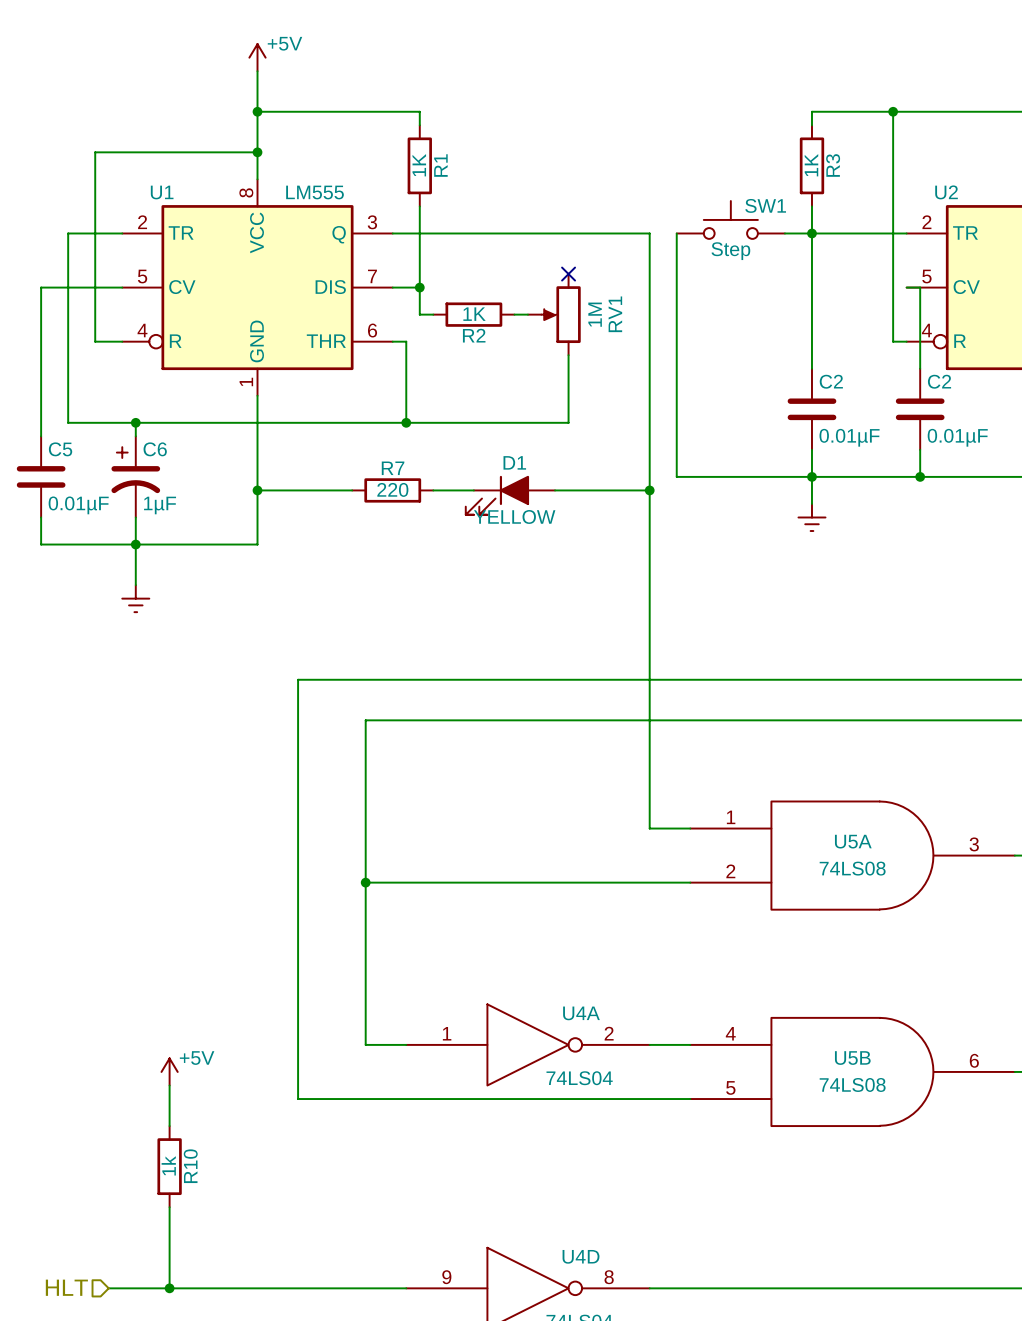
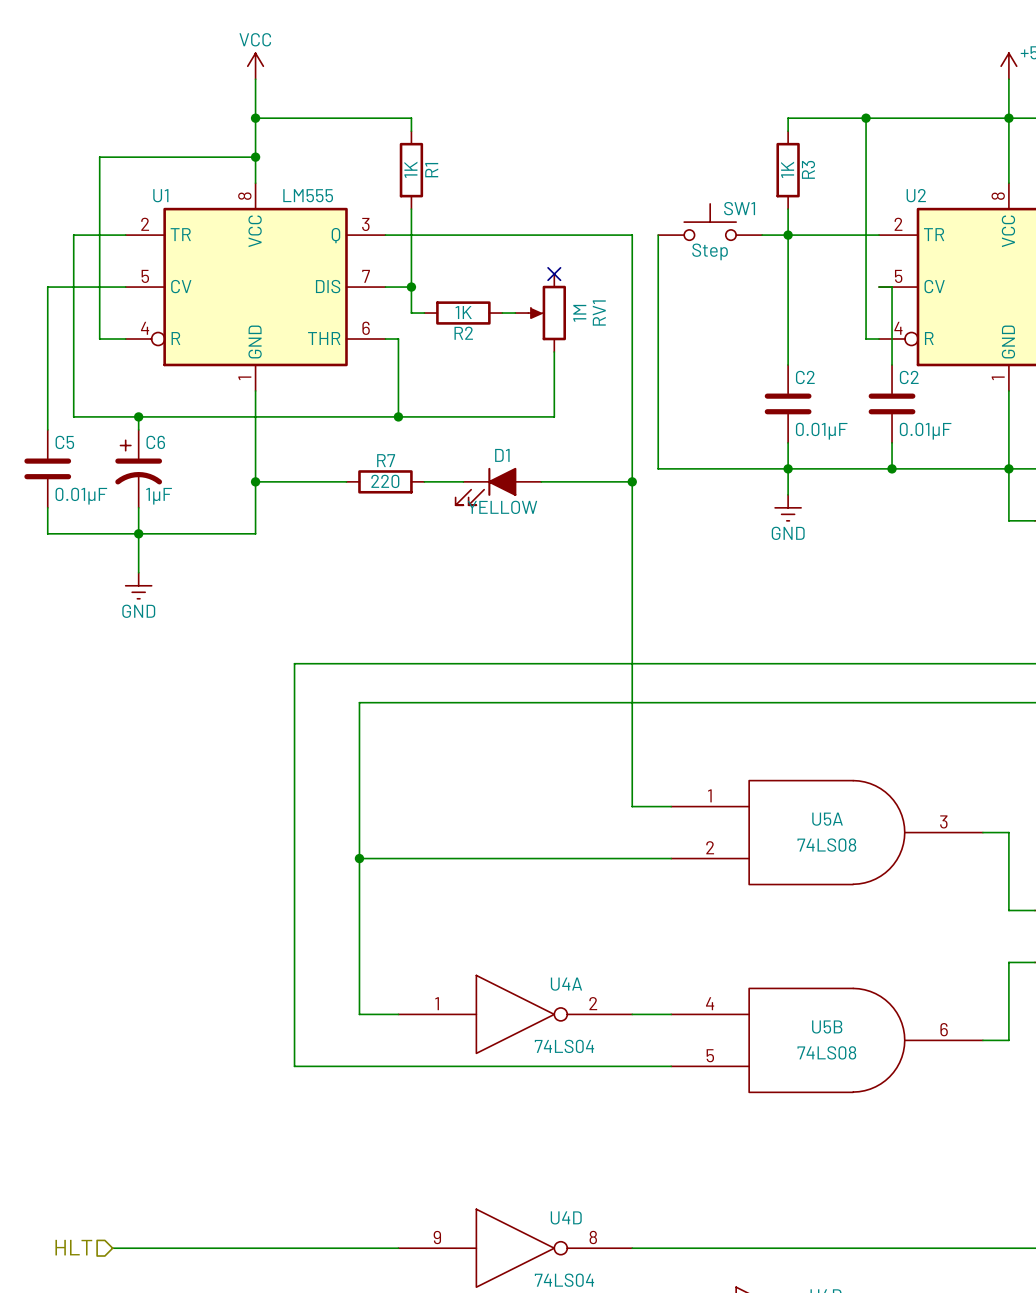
power symbol: +5V (257, 57) -> VCC (255, 66)
power symbol text: none -> GND (788, 533)
power symbol text: none -> GND (138, 611)
power symbol: +5V (169, 1071) -> none
wire: (169, 1085) (169, 1126) -> none
R10: 1k (169, 1166) -> none
wire: (169, 1207) (169, 1288) -> none
junction: (169, 1288) -> none

